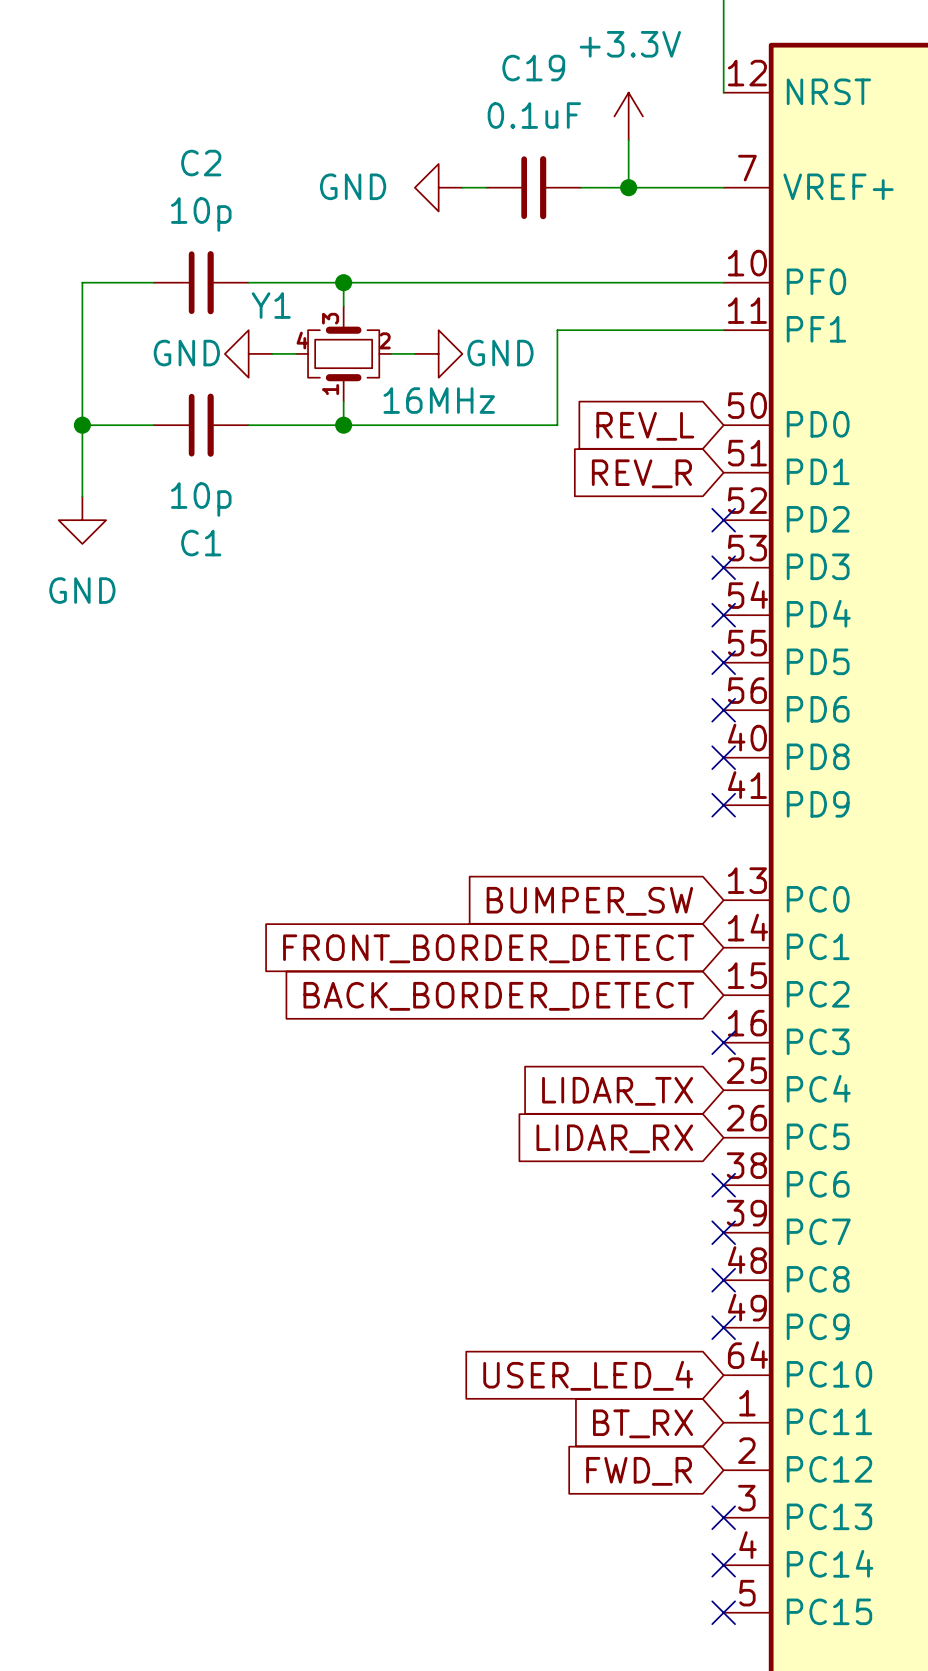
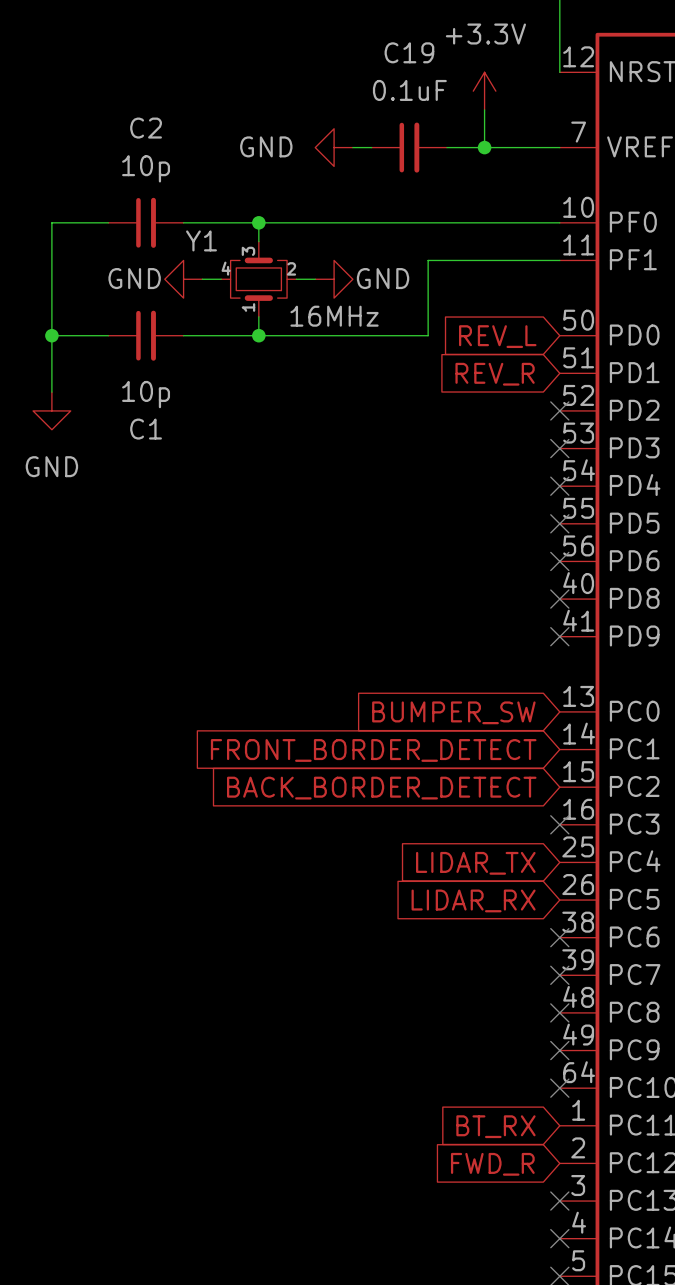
global label: USER_LED_4 (588, 1375) -> none
no-connect mark: none -> (559, 1088)

